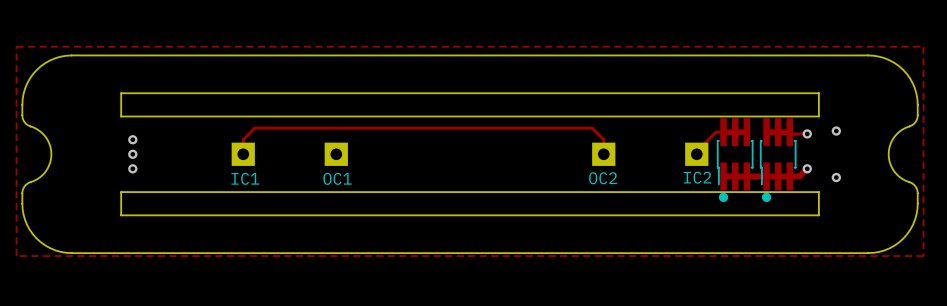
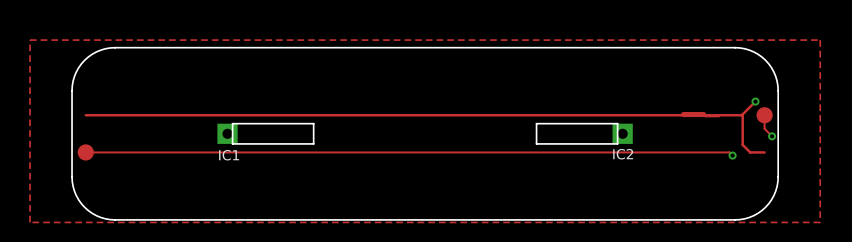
board edge: (114, 55) (66, 55) (50, 60) (36, 69) (29, 78) (25, 88) (22, 104) (23, 120) (45, 136) (51, 154) (45, 171) (37, 179) (26, 184) (22, 190) (23, 214) (29, 230) (45, 245) (60, 251) (114, 253) -> (115, 47) (100, 50) (84, 60) (76, 72) (72, 90) (72, 176) (74, 191) (78, 199) (88, 210) (100, 217) (115, 219)
board edge: (825, 55) (873, 55) (889, 60) (899, 66) (910, 78) (914, 88) (917, 104) (916, 120) (894, 136) (888, 154) (894, 171) (902, 179) (913, 184) (917, 190) (916, 214) (910, 230) (899, 242) (879, 251) (825, 253) -> (735, 47) (753, 51) (765, 60) (773, 72) (778, 90) (778, 176) (775, 191) (768, 203) (758, 213) (744, 218) (735, 219)
board edge: (121, 93) (121, 116) (818, 116) (818, 93) (121, 93) -> none
track: none -> (755, 101) (741, 115) (85, 115)
track: none -> (742, 114) (742, 144) (750, 152) (764, 152)
via position: (836, 131) -> (755, 101)
track: (746, 132) (715, 132) (696, 151) (696, 154) -> none
via: (807, 133) -> none
track: none -> (764, 115) (764, 128) (772, 136)
part: none -> (764, 115)
via: (132, 139) -> none
board edge: none -> (232, 123) (232, 143) (313, 143) (313, 123) (232, 123)
board edge: none -> (536, 123) (536, 143) (617, 143) (617, 123) (536, 123)
via: (132, 154) -> none
track: (243, 154) (243, 139) (254, 128) (592, 128) (603, 139) (603, 154) -> none
OC1: (336, 154) -> none
OC2: (603, 154) -> none
via: none -> (772, 136)
part: (735, 160) -> none
part: (778, 160) -> none
via: (132, 168) -> none
track: (807, 168) (799, 176) (723, 176) -> none
via: (807, 168) -> none
track: none -> (85, 152) (729, 152) (732, 155)
part: none -> (85, 152)
via: (836, 177) -> none
via: none -> (732, 155)
board edge: (121, 192) (121, 215) (818, 215) (818, 192) (121, 192) -> none

